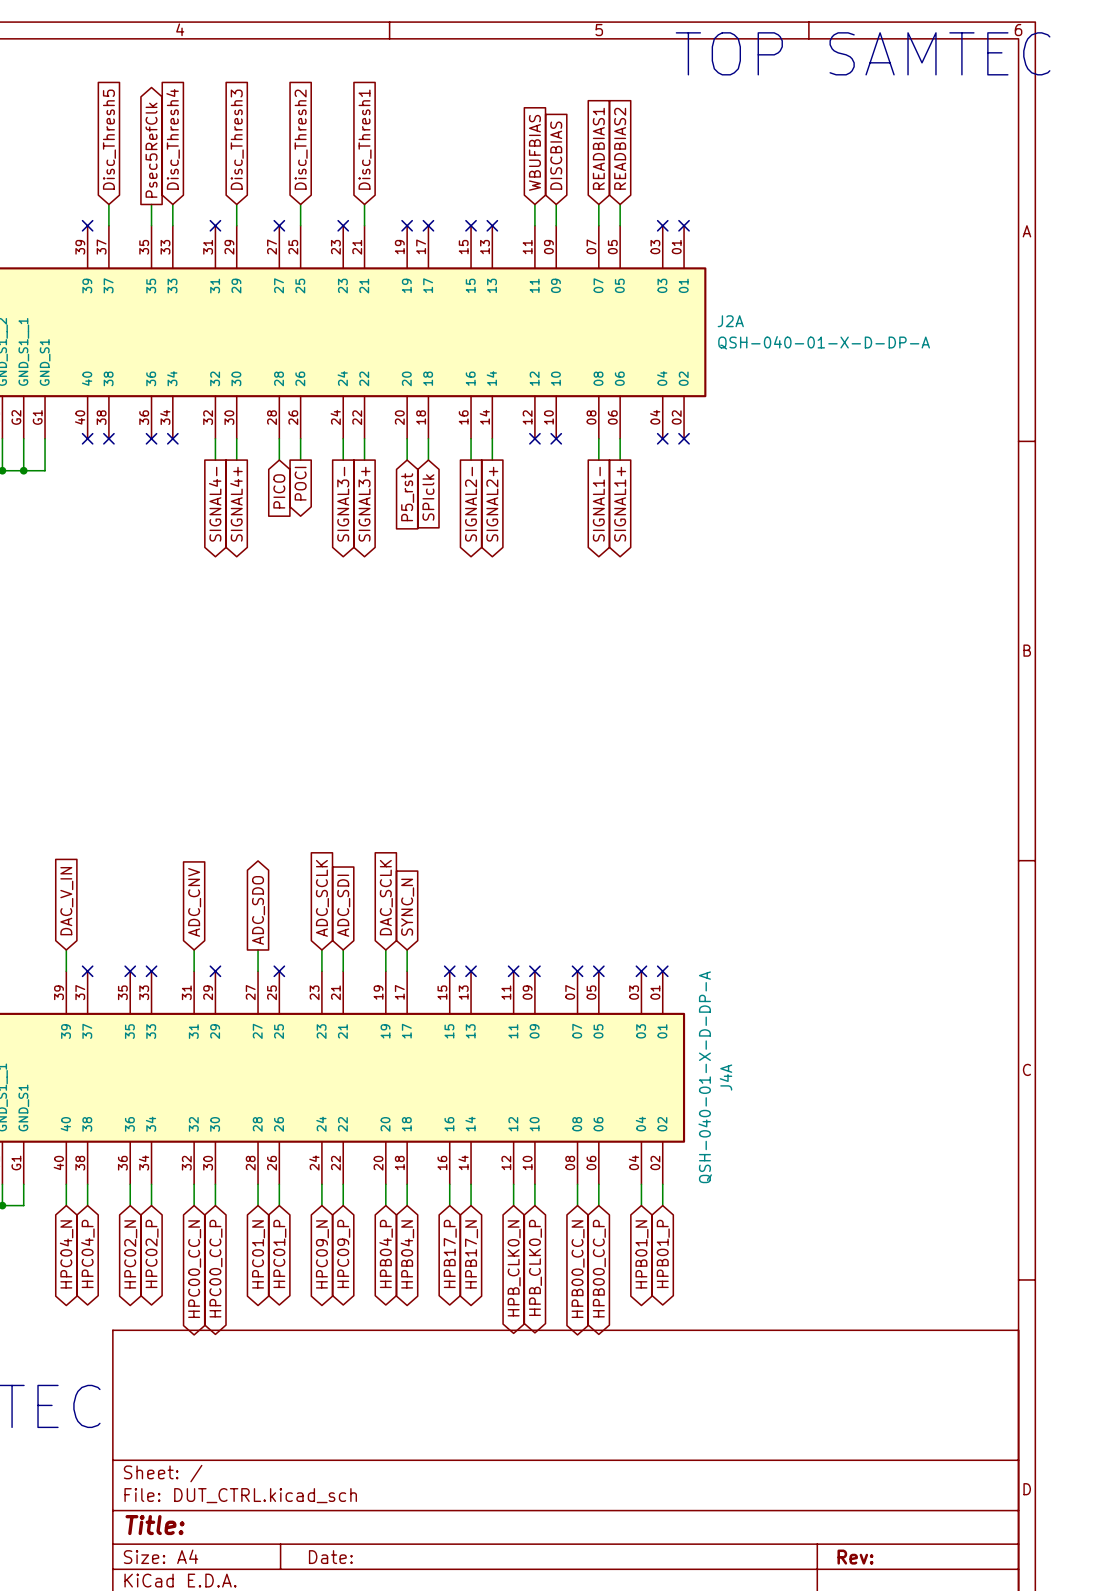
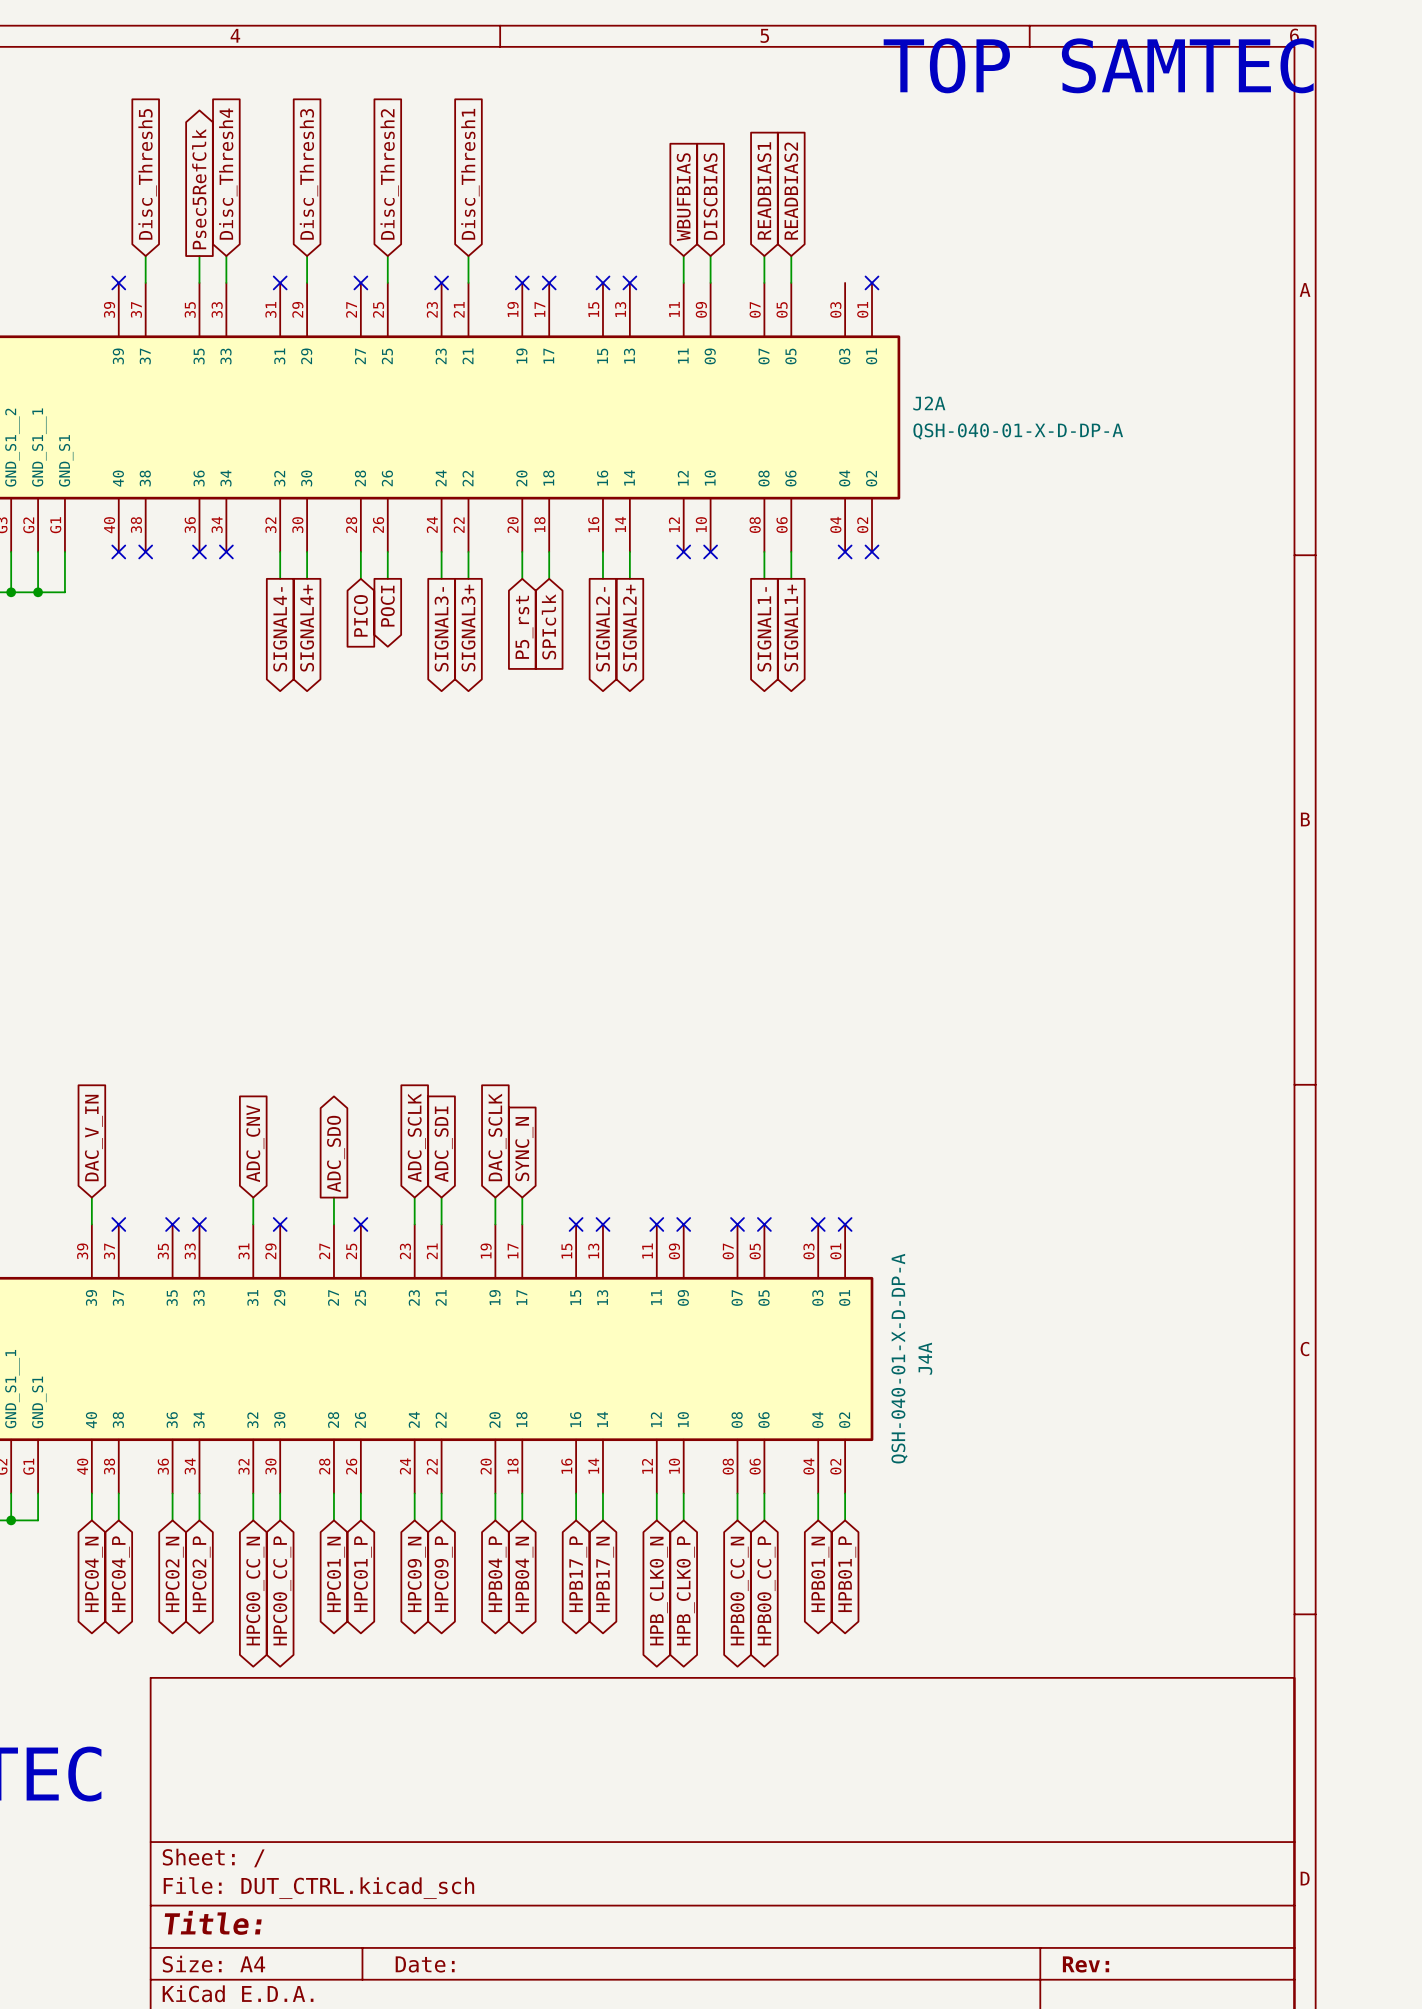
no-connect mark: (662, 225) -> none

